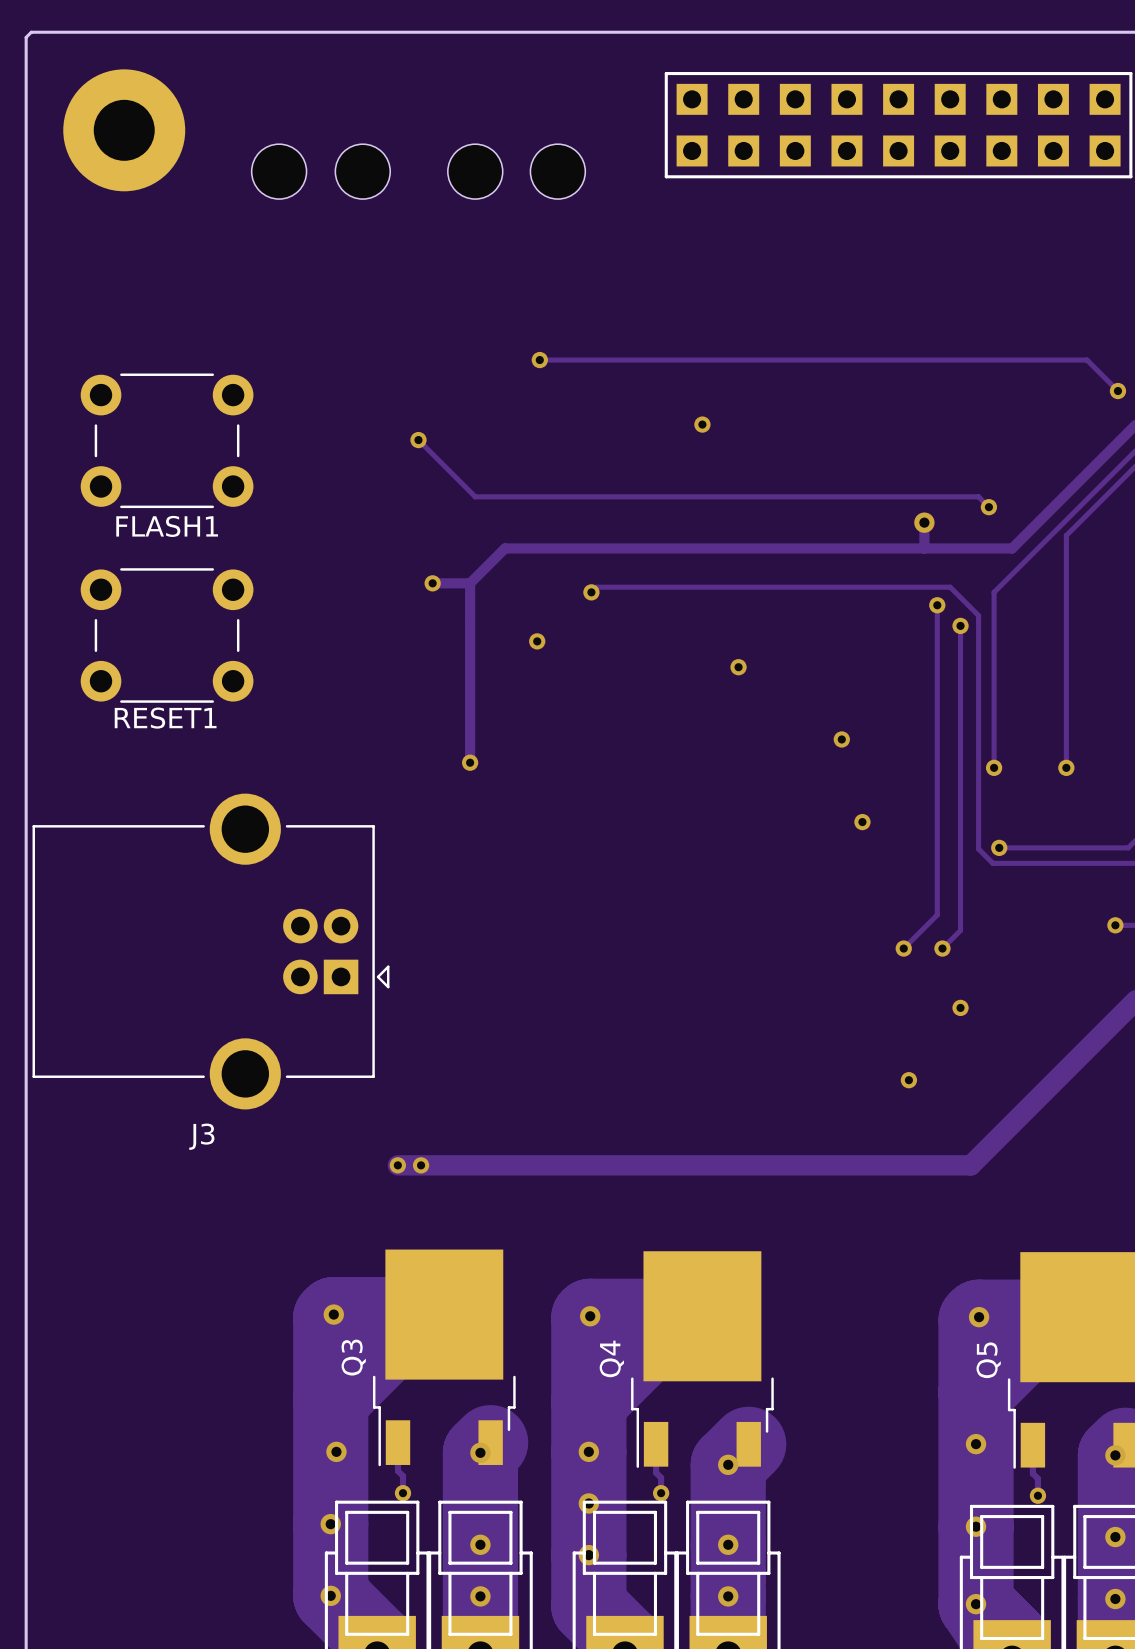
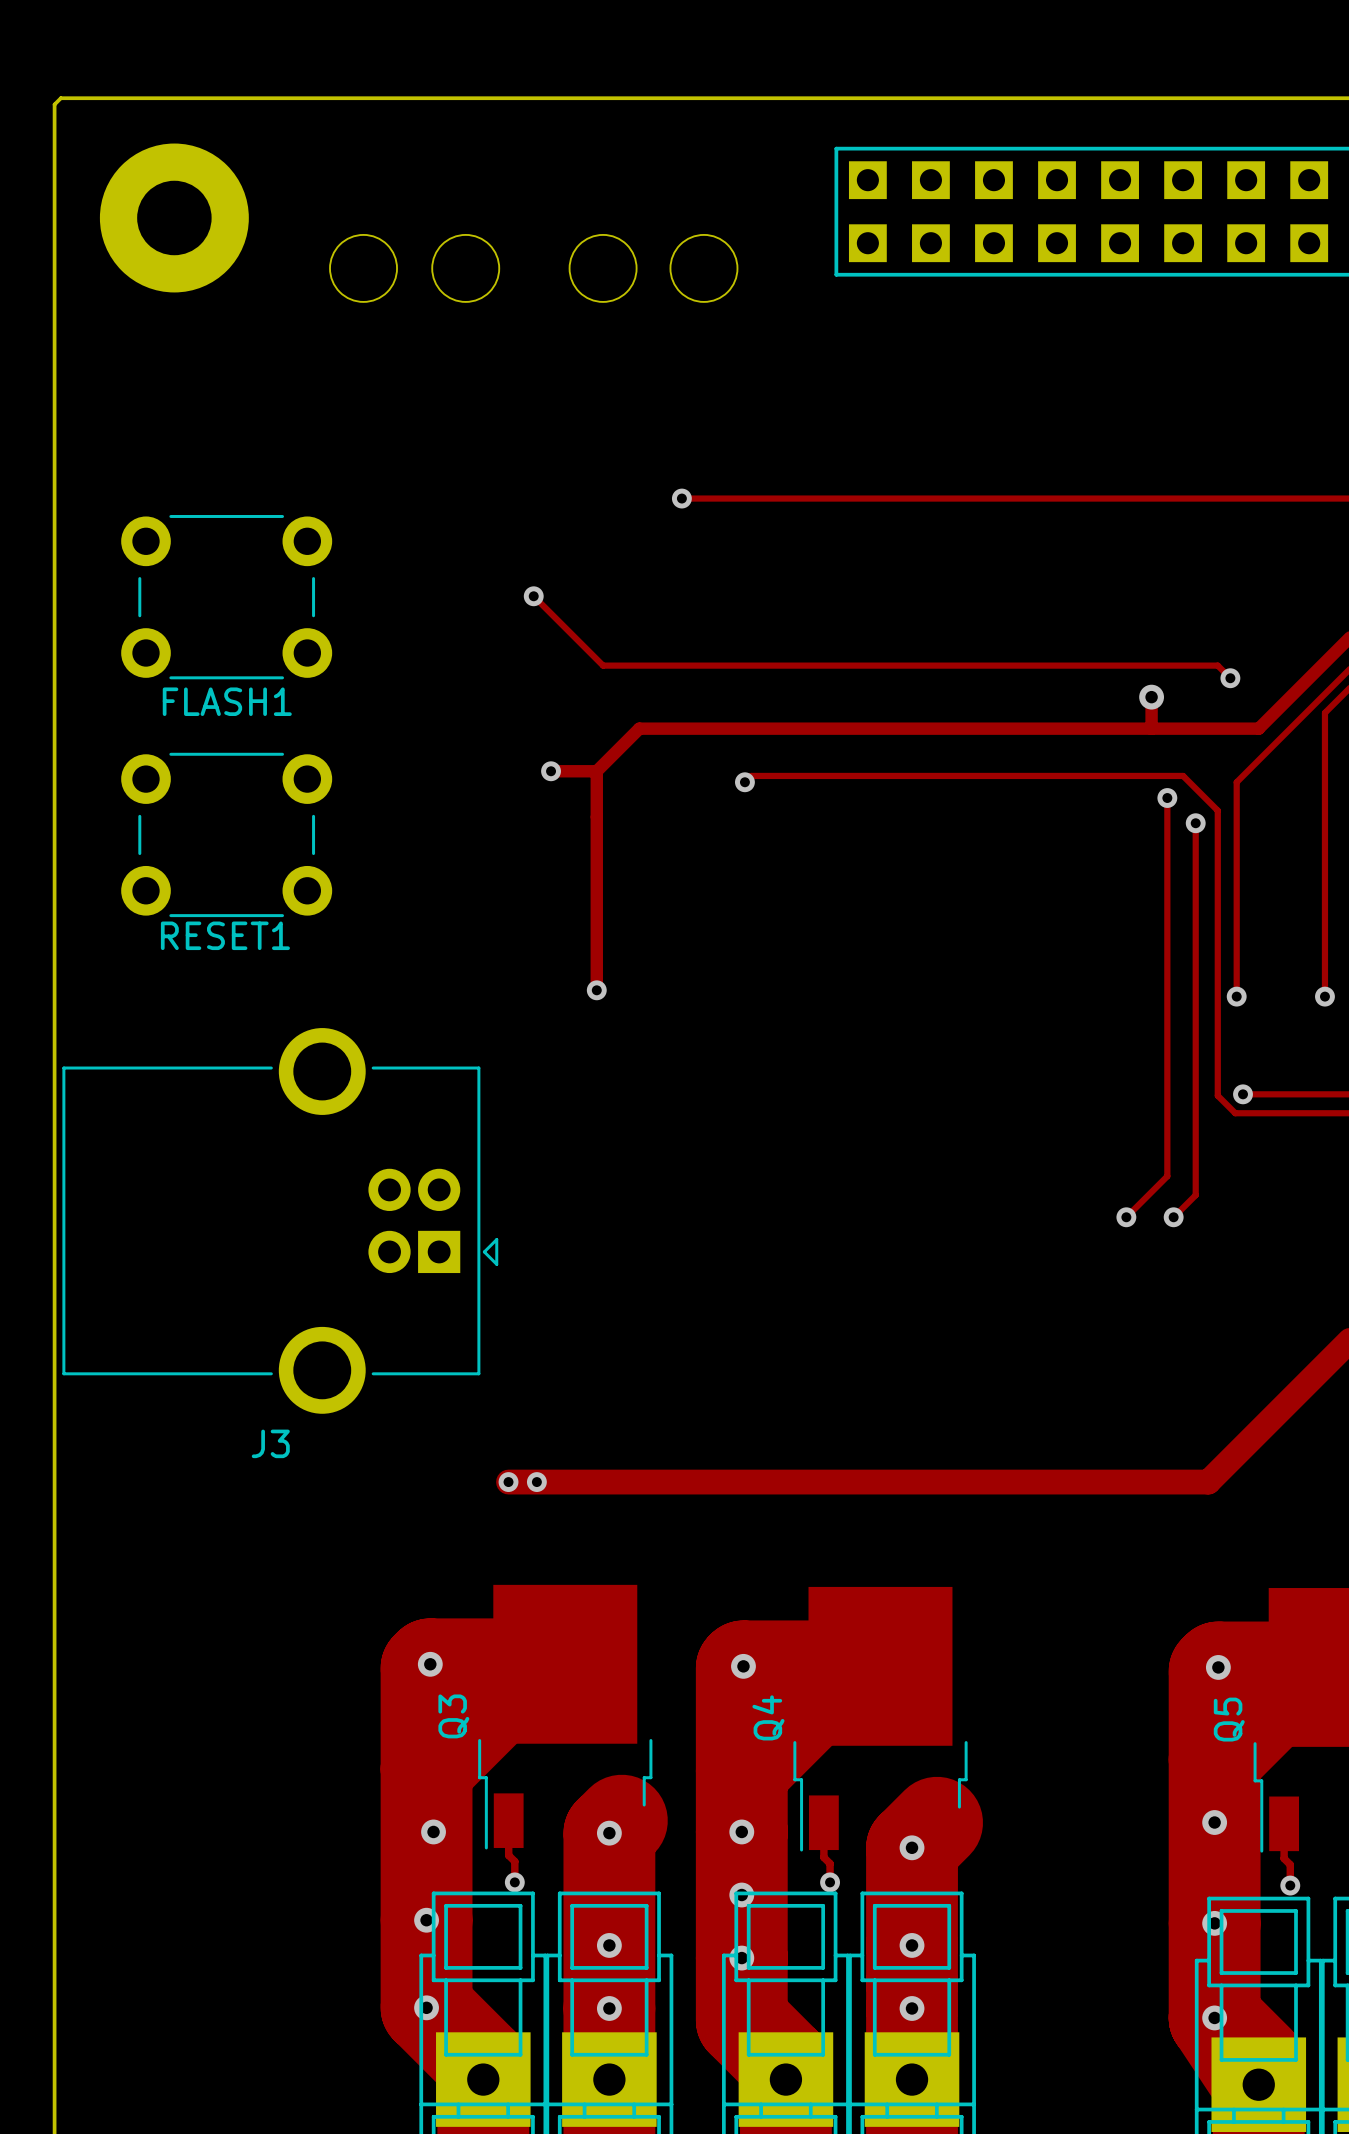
via: (702, 424) -> none
via: (537, 641) -> none
via: (738, 667) -> none
via: (841, 739) -> none
via: (862, 822) -> none
via: (960, 1007) -> none
via: (908, 1080) -> none

